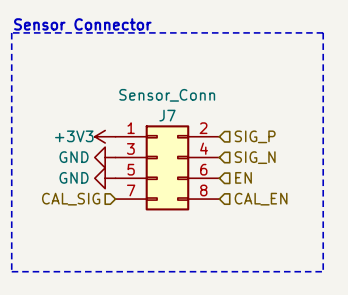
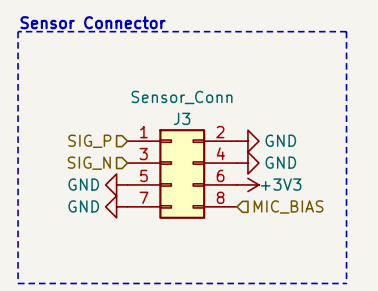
J7 name: J7 (167, 115) -> J3 (182, 118)
power symbol rotation: 0° (105, 136) -> 180° (247, 184)
power symbol position: +3V3 (105, 136) -> +3V3 (247, 184)
power symbol: none -> GND (247, 141)
hierarchical label rotation: 0° (255, 136) -> 180° (89, 141)
hierarchical label position: SIG_P (255, 136) -> SIG_P (89, 141)
power symbol position: GND (105, 157) -> GND (116, 206)
power symbol: none -> GND (247, 163)
hierarchical label rotation: 0° (255, 157) -> 180° (89, 163)
hierarchical label position: SIG_N (255, 157) -> SIG_N (89, 163)
hierarchical label: EN (243, 177) -> none
hierarchical label: CAL_SIG (71, 199) -> none
hierarchical label: CAL_EN (261, 199) -> MIC_BIAS (288, 206)

